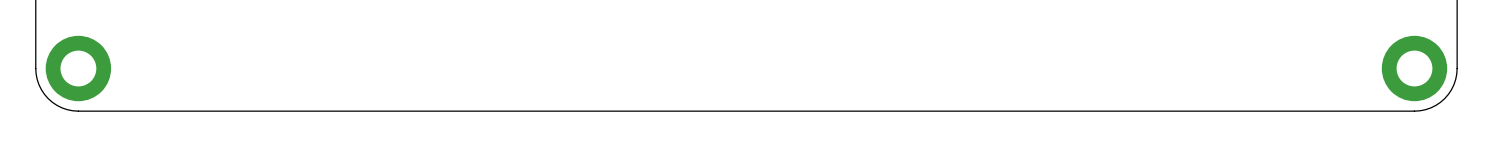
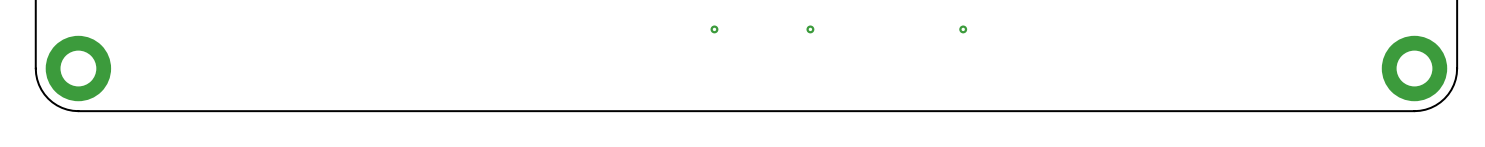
via: none -> (714, 29)
via: none -> (810, 29)
via: none -> (963, 29)

